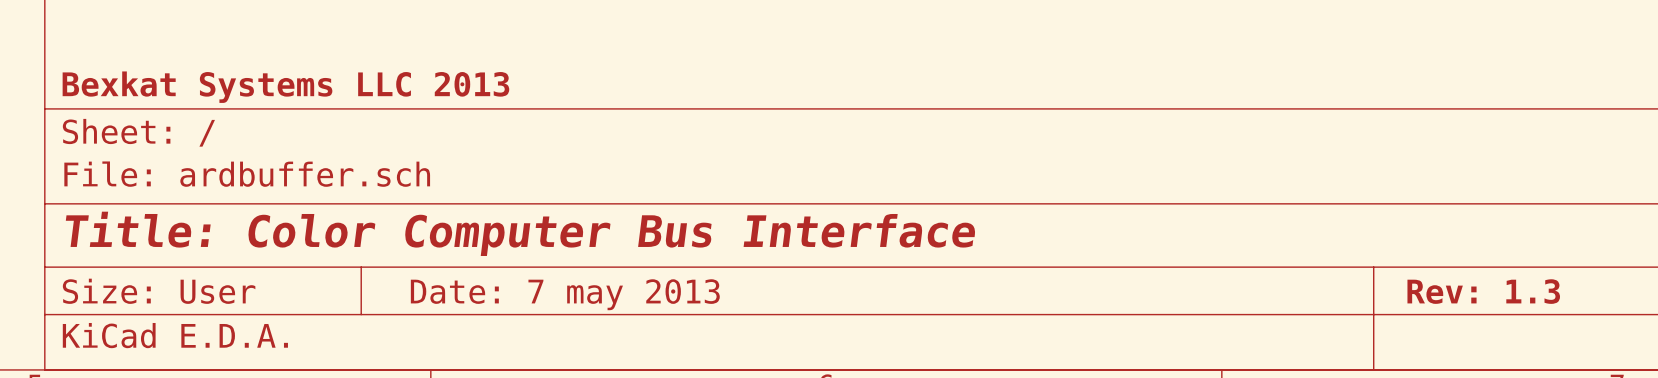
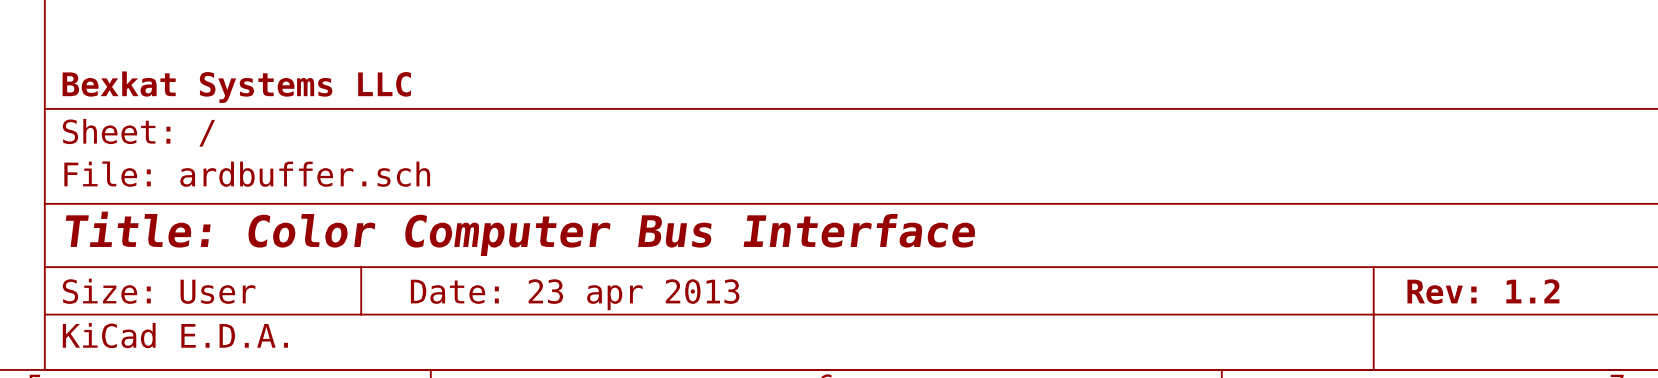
title block: Bexkat Systems LLC 2013 (285, 87) -> Bexkat Systems LLC (236, 87)
title block: Rev: 1.3 (1483, 291) -> Rev: 1.2 (1483, 291)
title block: Date: 7 may 2013 (565, 294) -> Date: 23 apr 2013 (575, 294)

